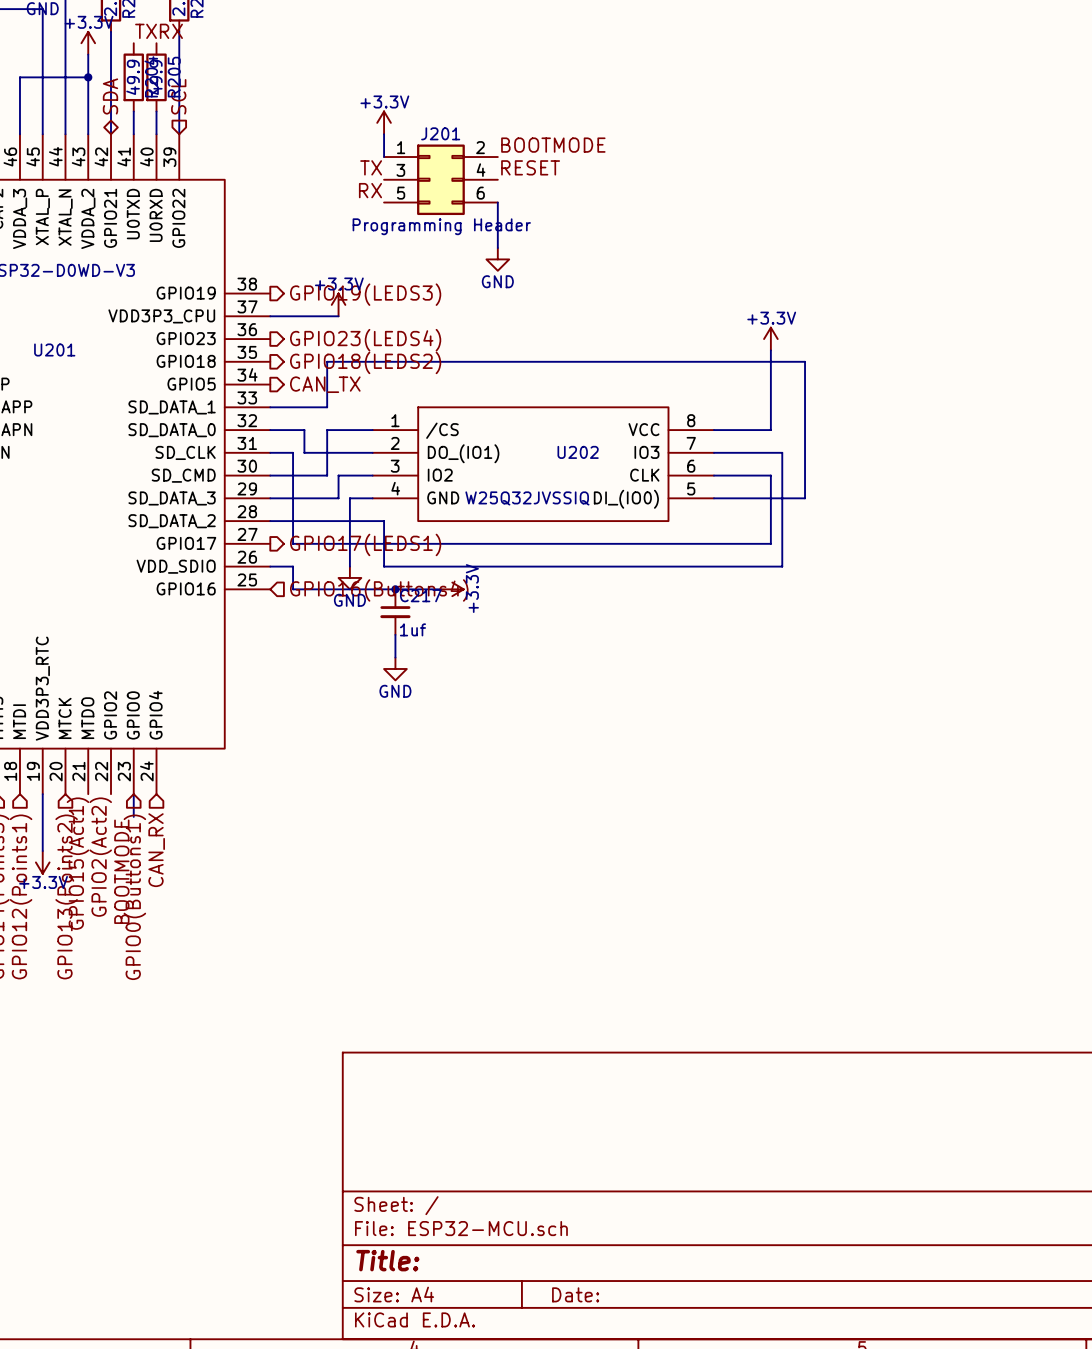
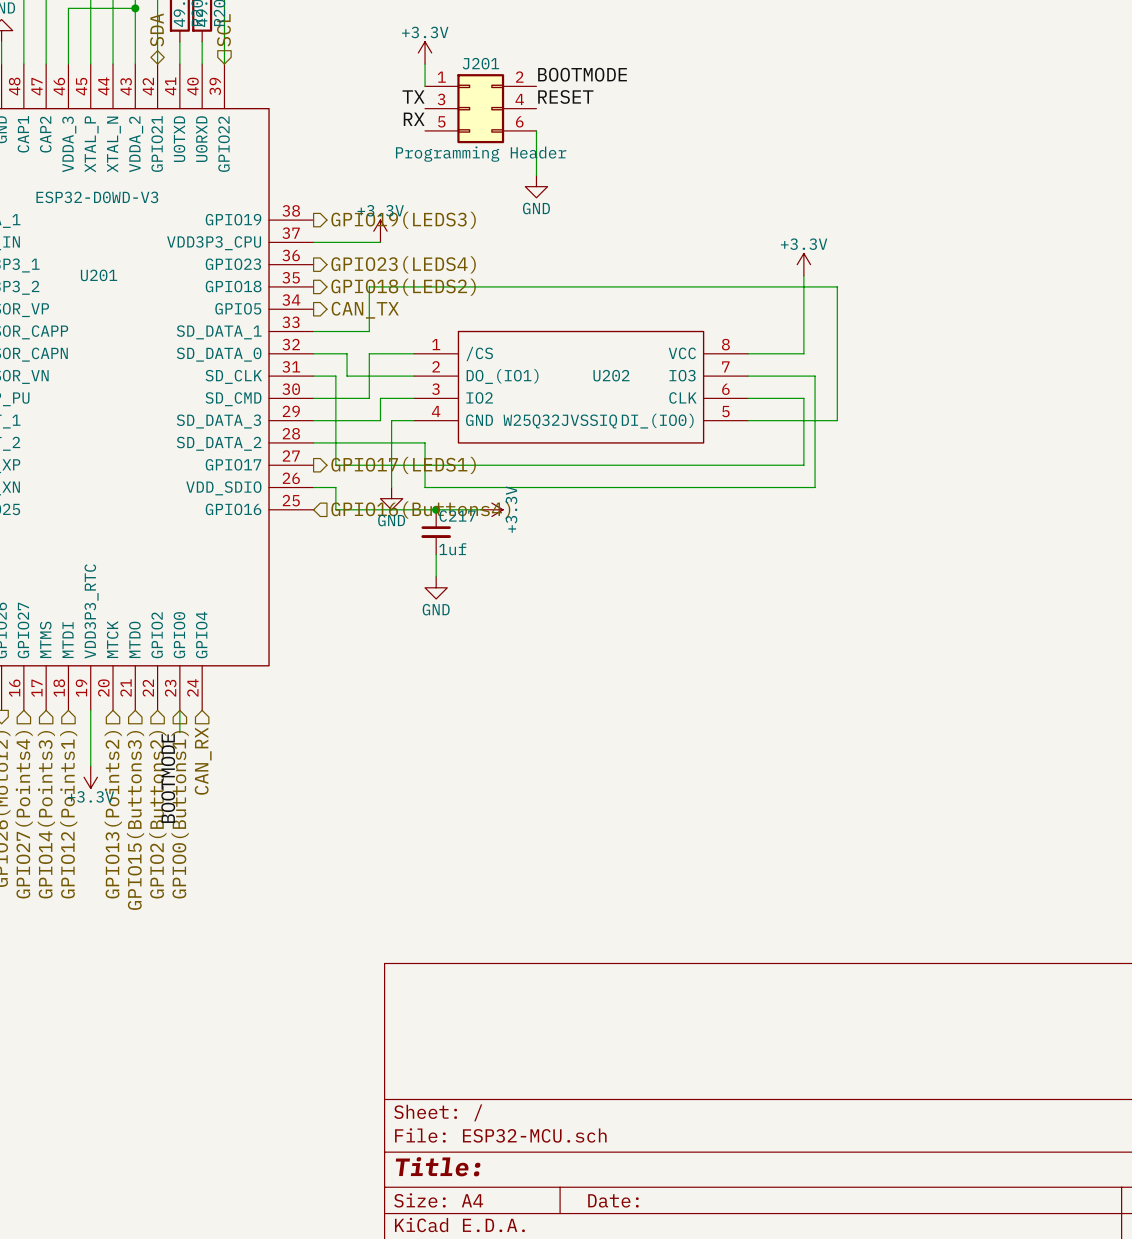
label: GPIO2(Act2) (100, 857) -> none
label: GPIO15(Act1) (77, 863) -> none
hierarchical label: none -> GPIO2(Buttons2) (157, 814)
hierarchical label: none -> GPIO15(Buttons3) (135, 820)

